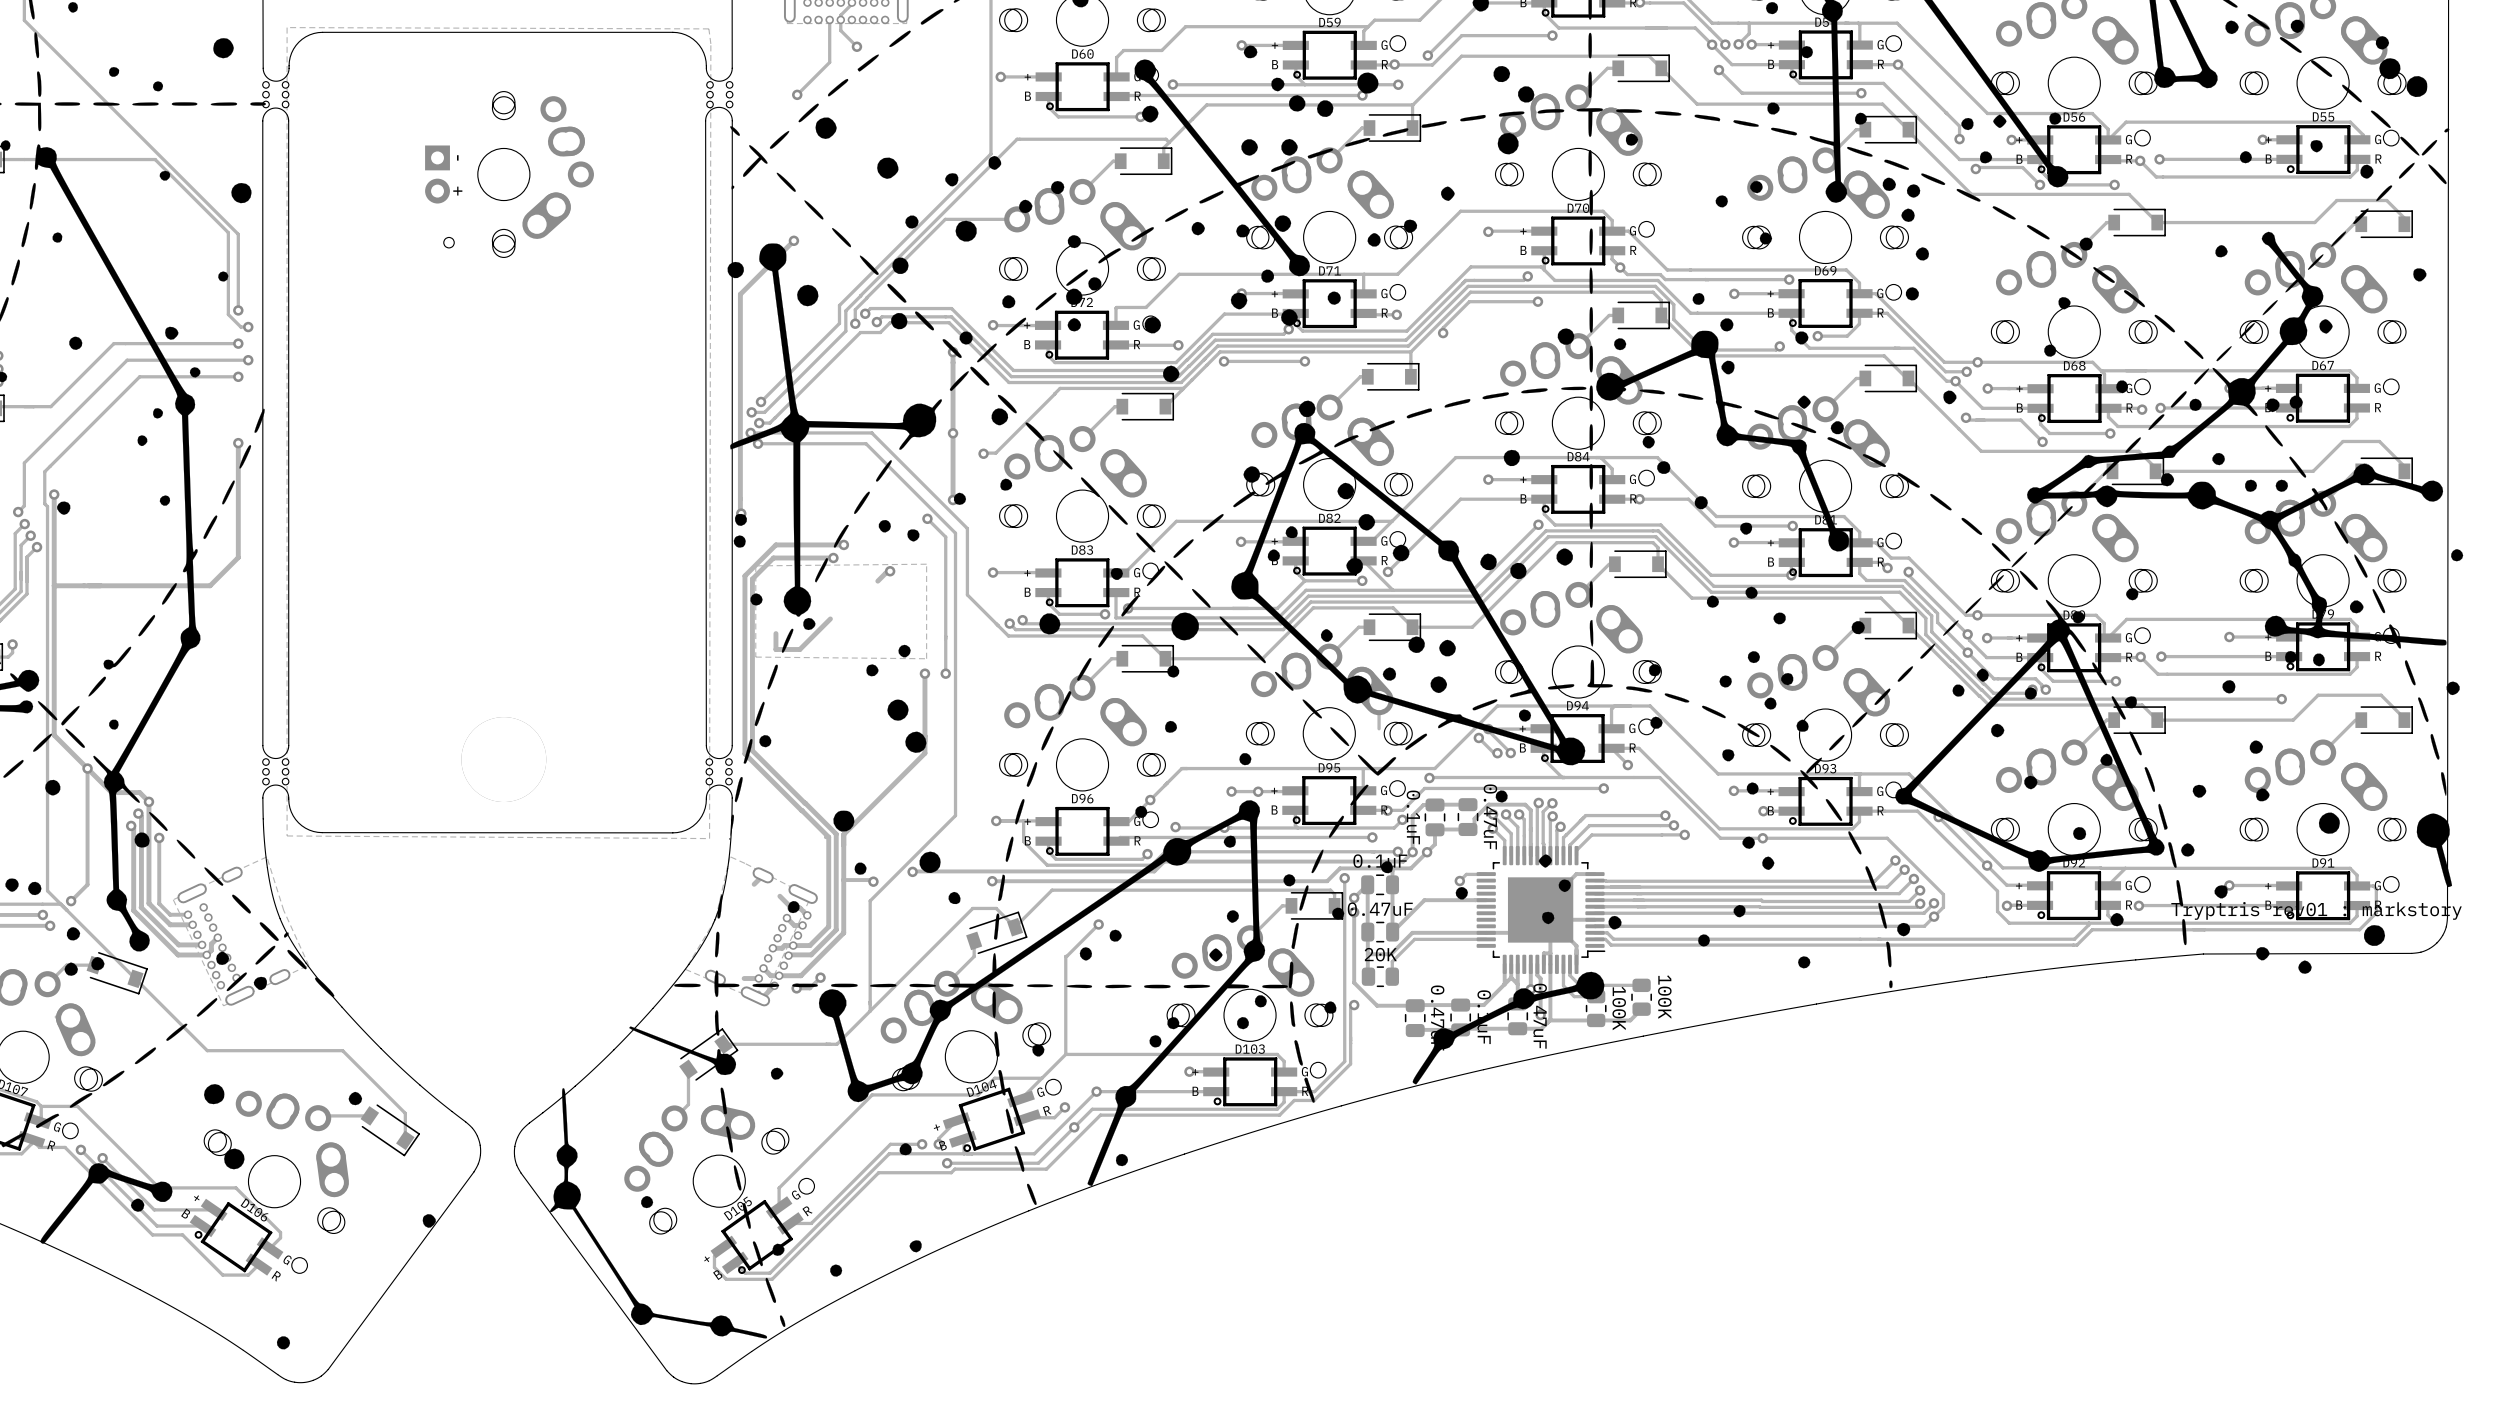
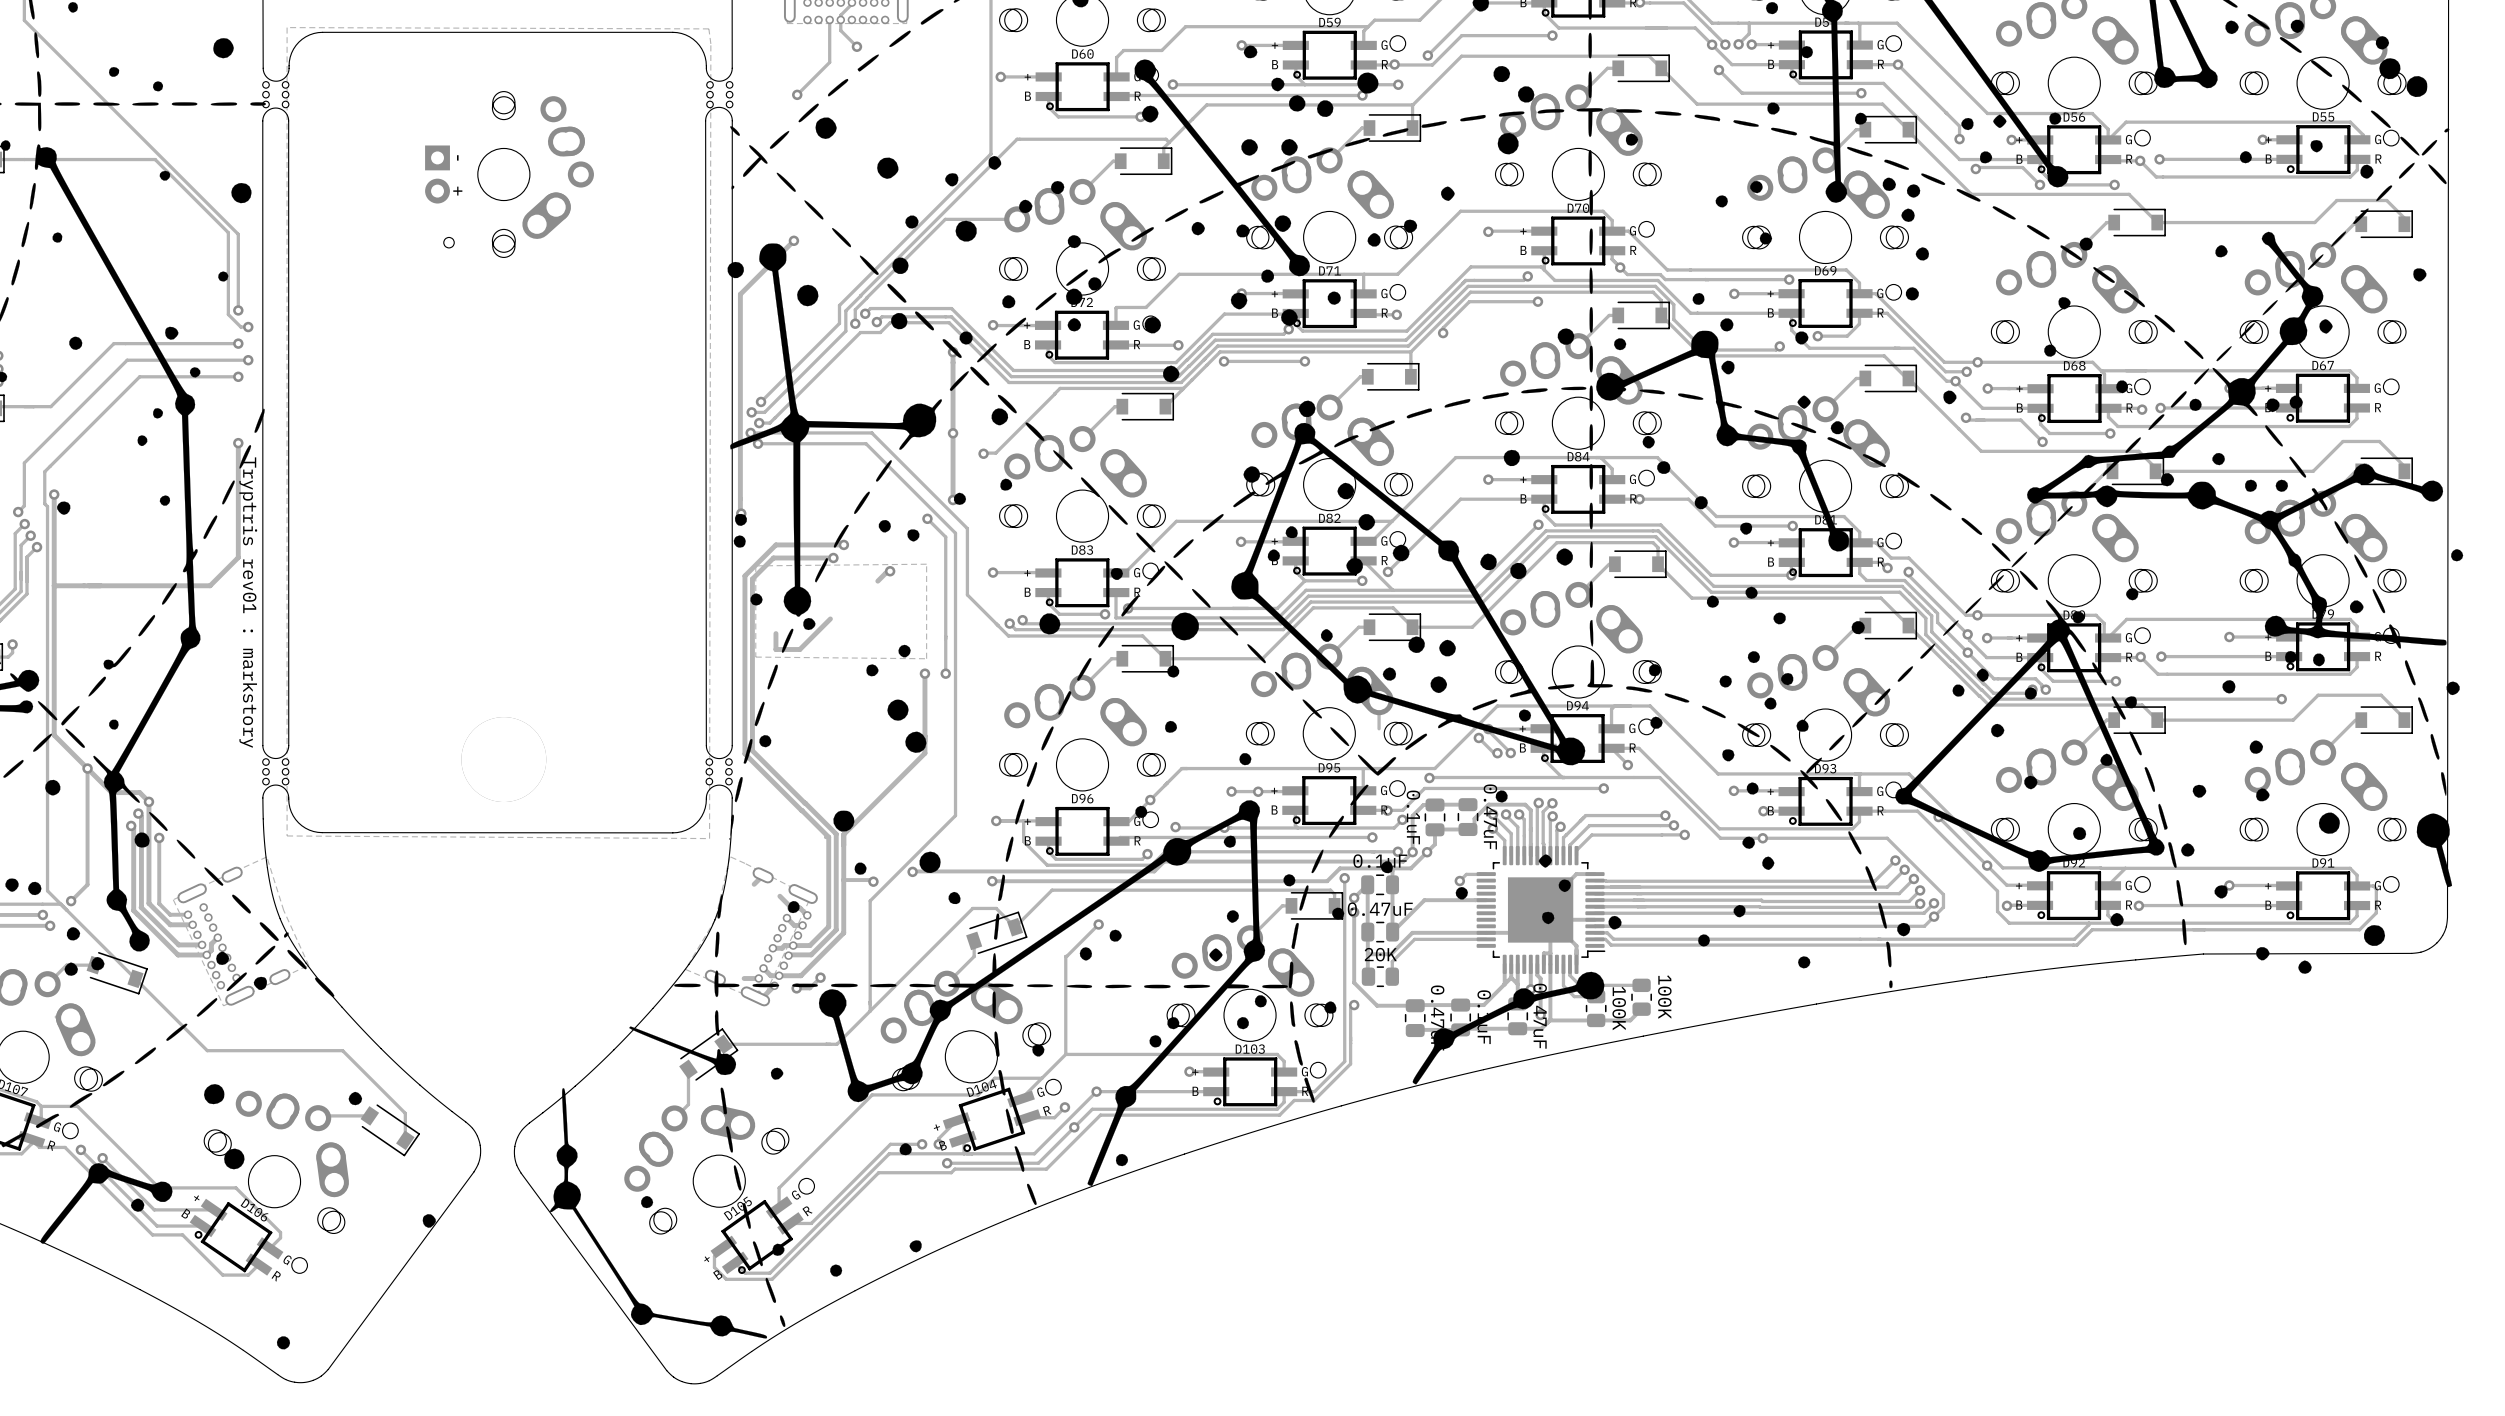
text: none -> Tryptris rev01 : markstory (248, 602)
text: Tryptris rev01 : markstory (2316, 910) -> none

